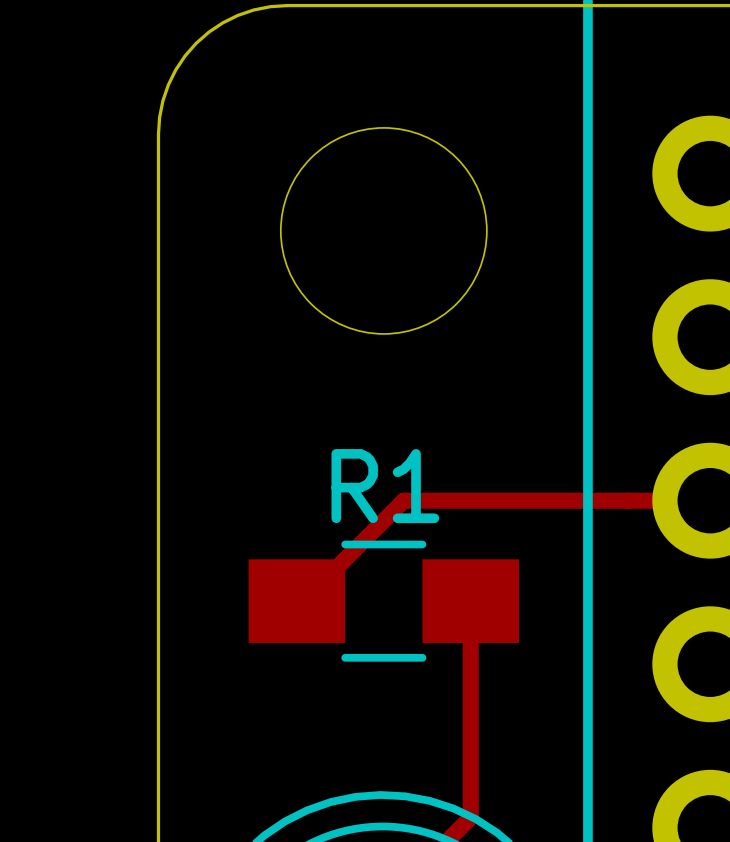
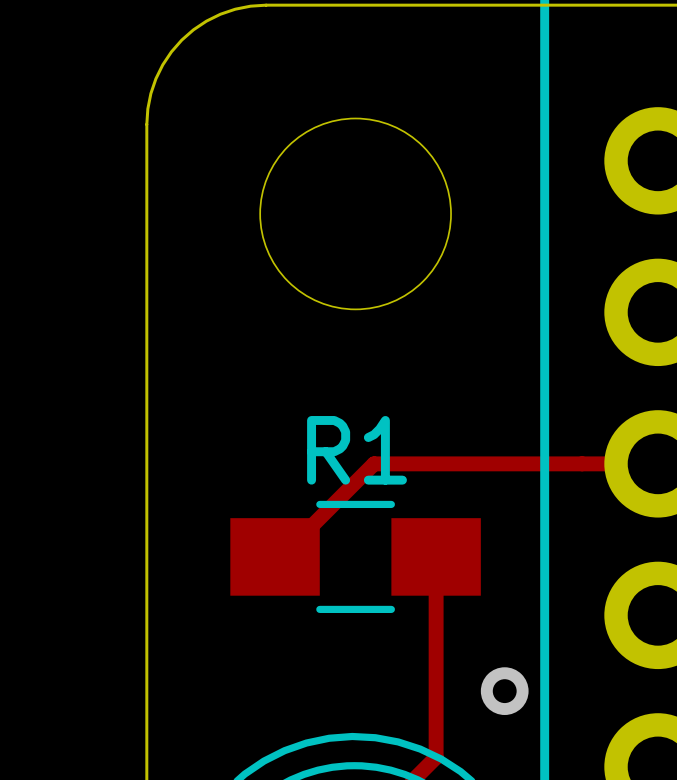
via: none -> (504, 691)

